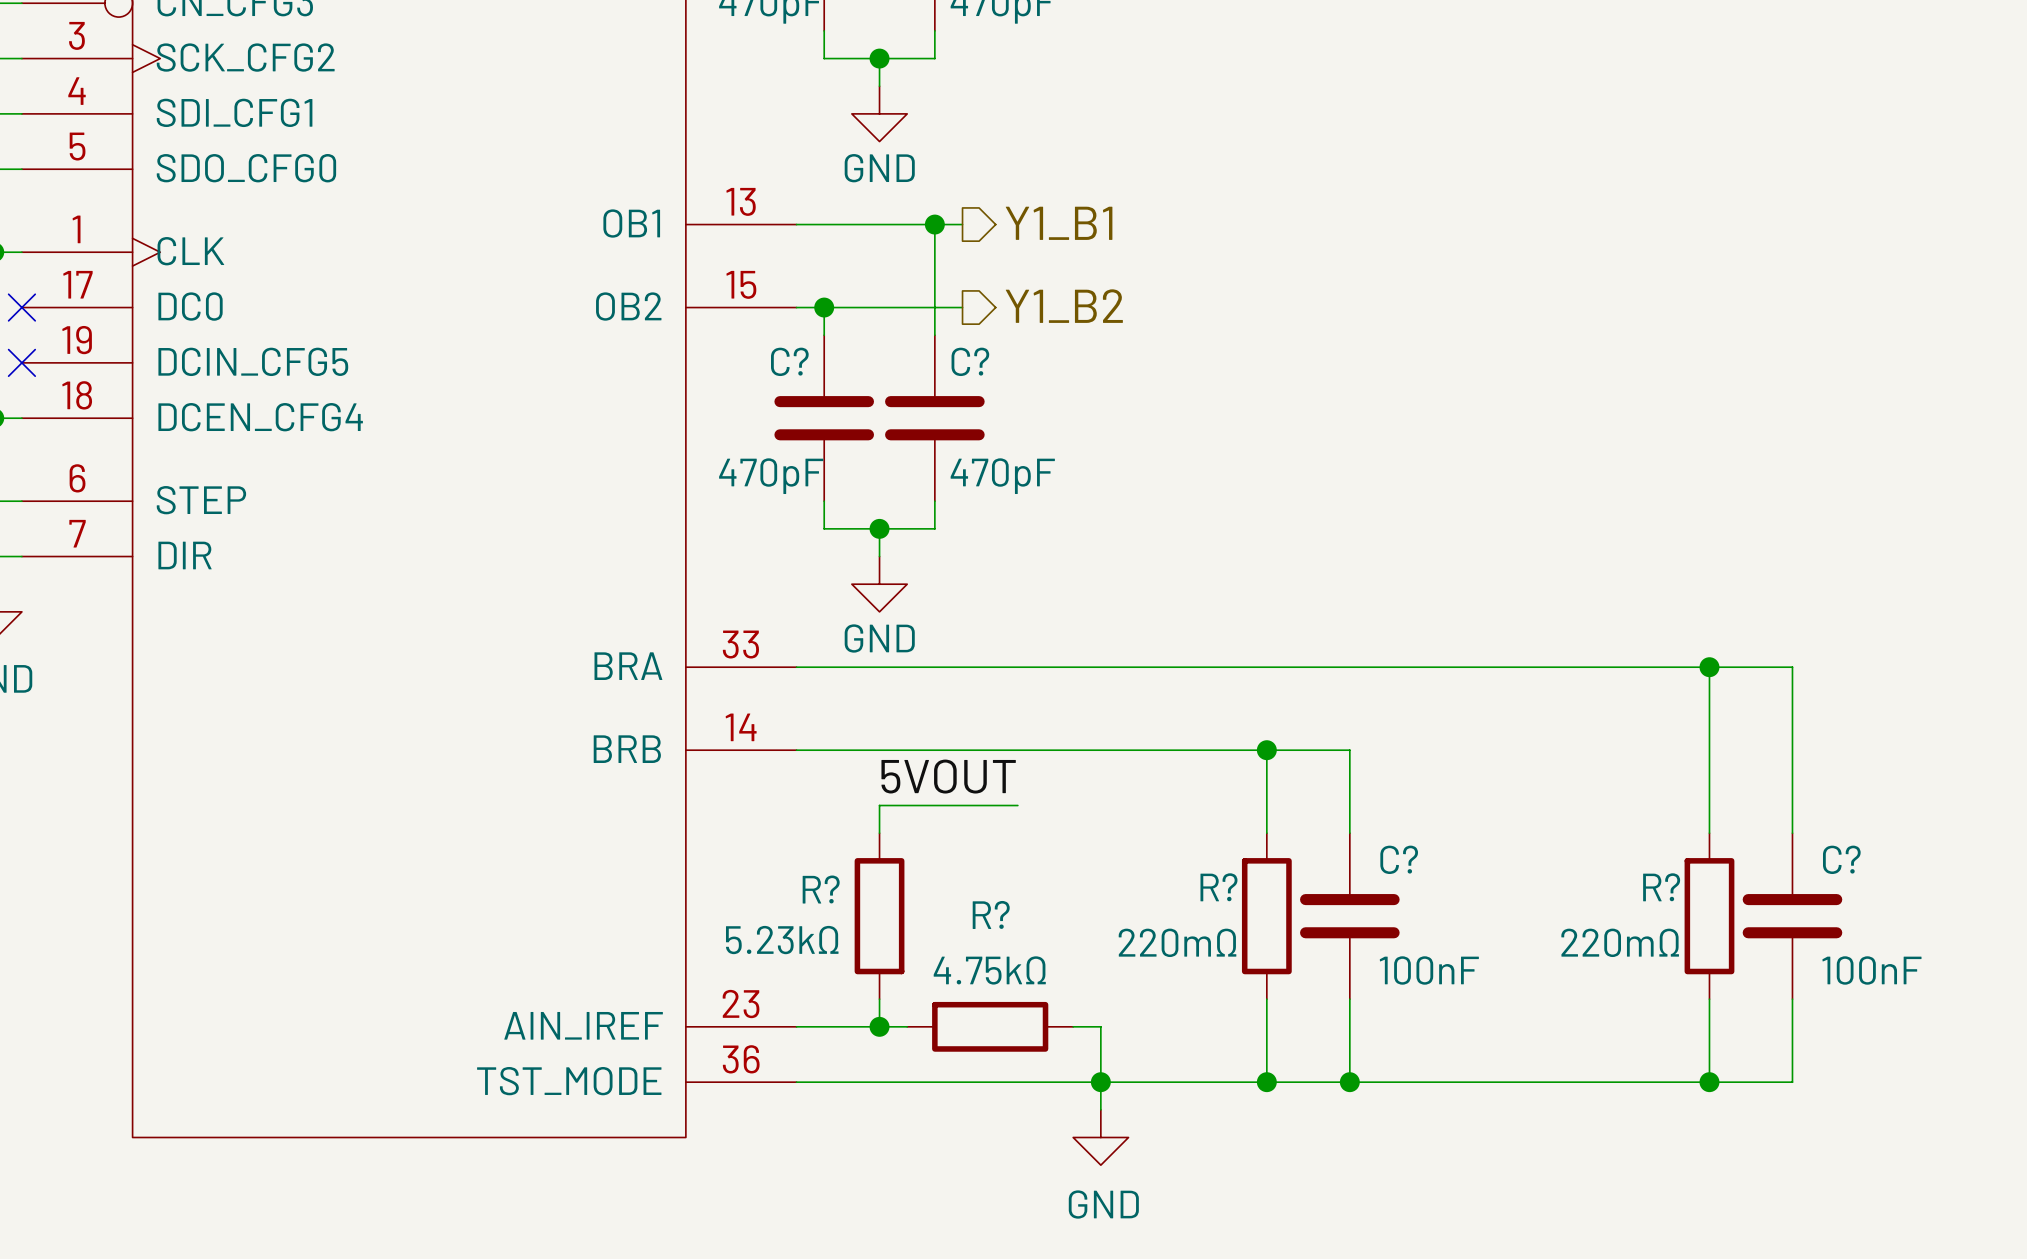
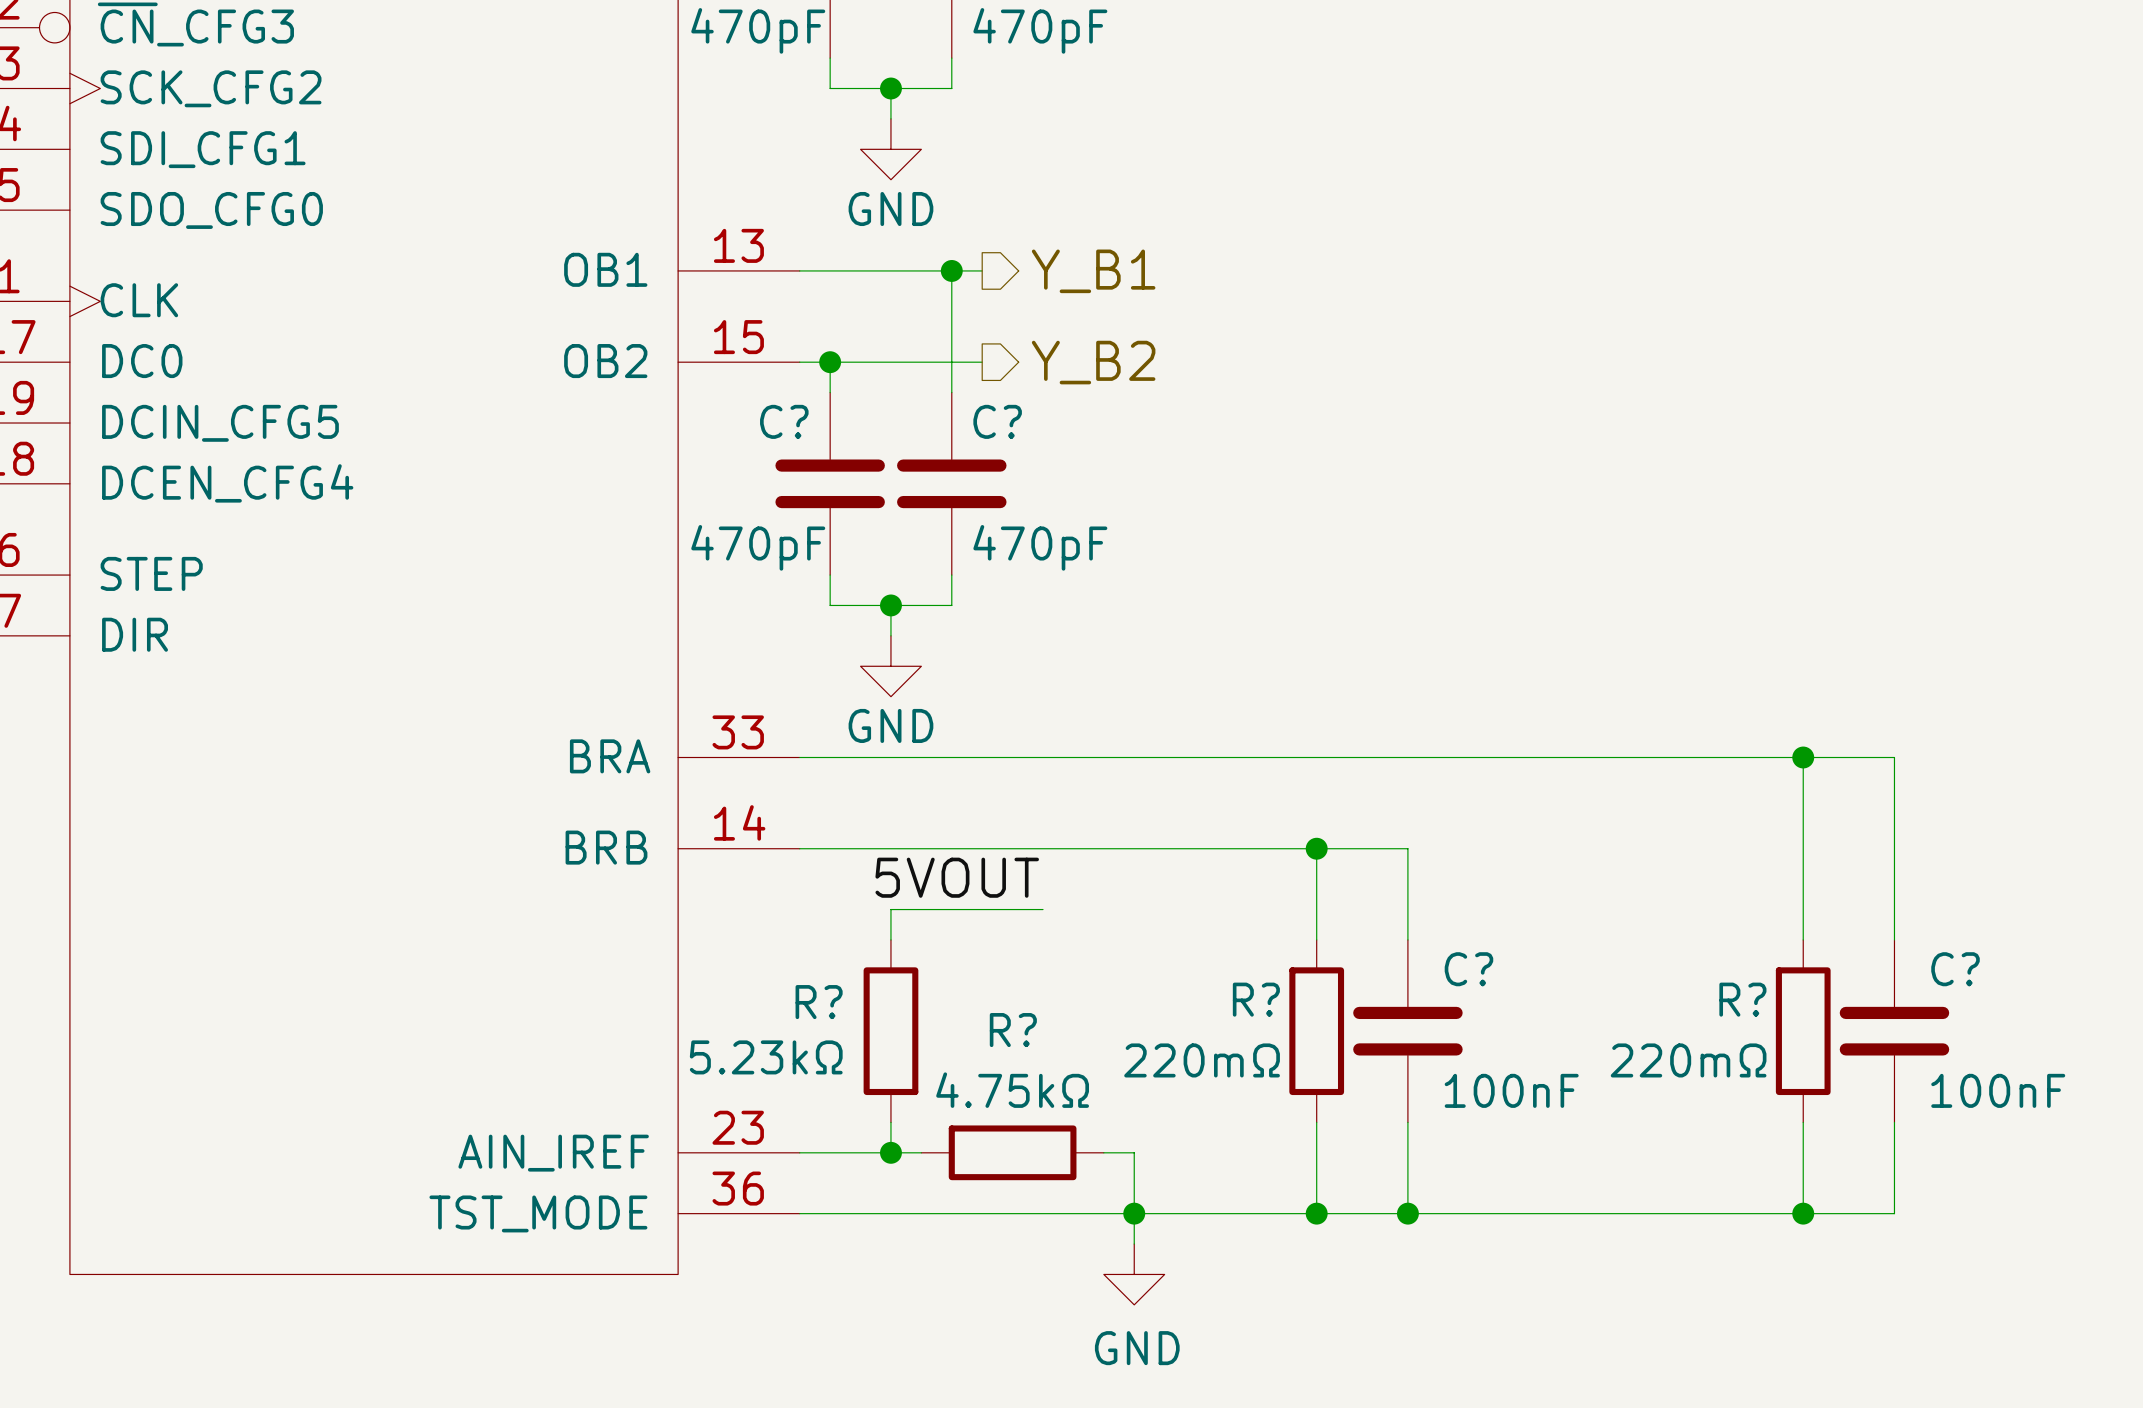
hierarchical label: Y1_B1 (1059, 223) -> Y_B1 (1093, 271)
hierarchical label: Y1_B2 (1064, 306) -> Y_B2 (1093, 362)

